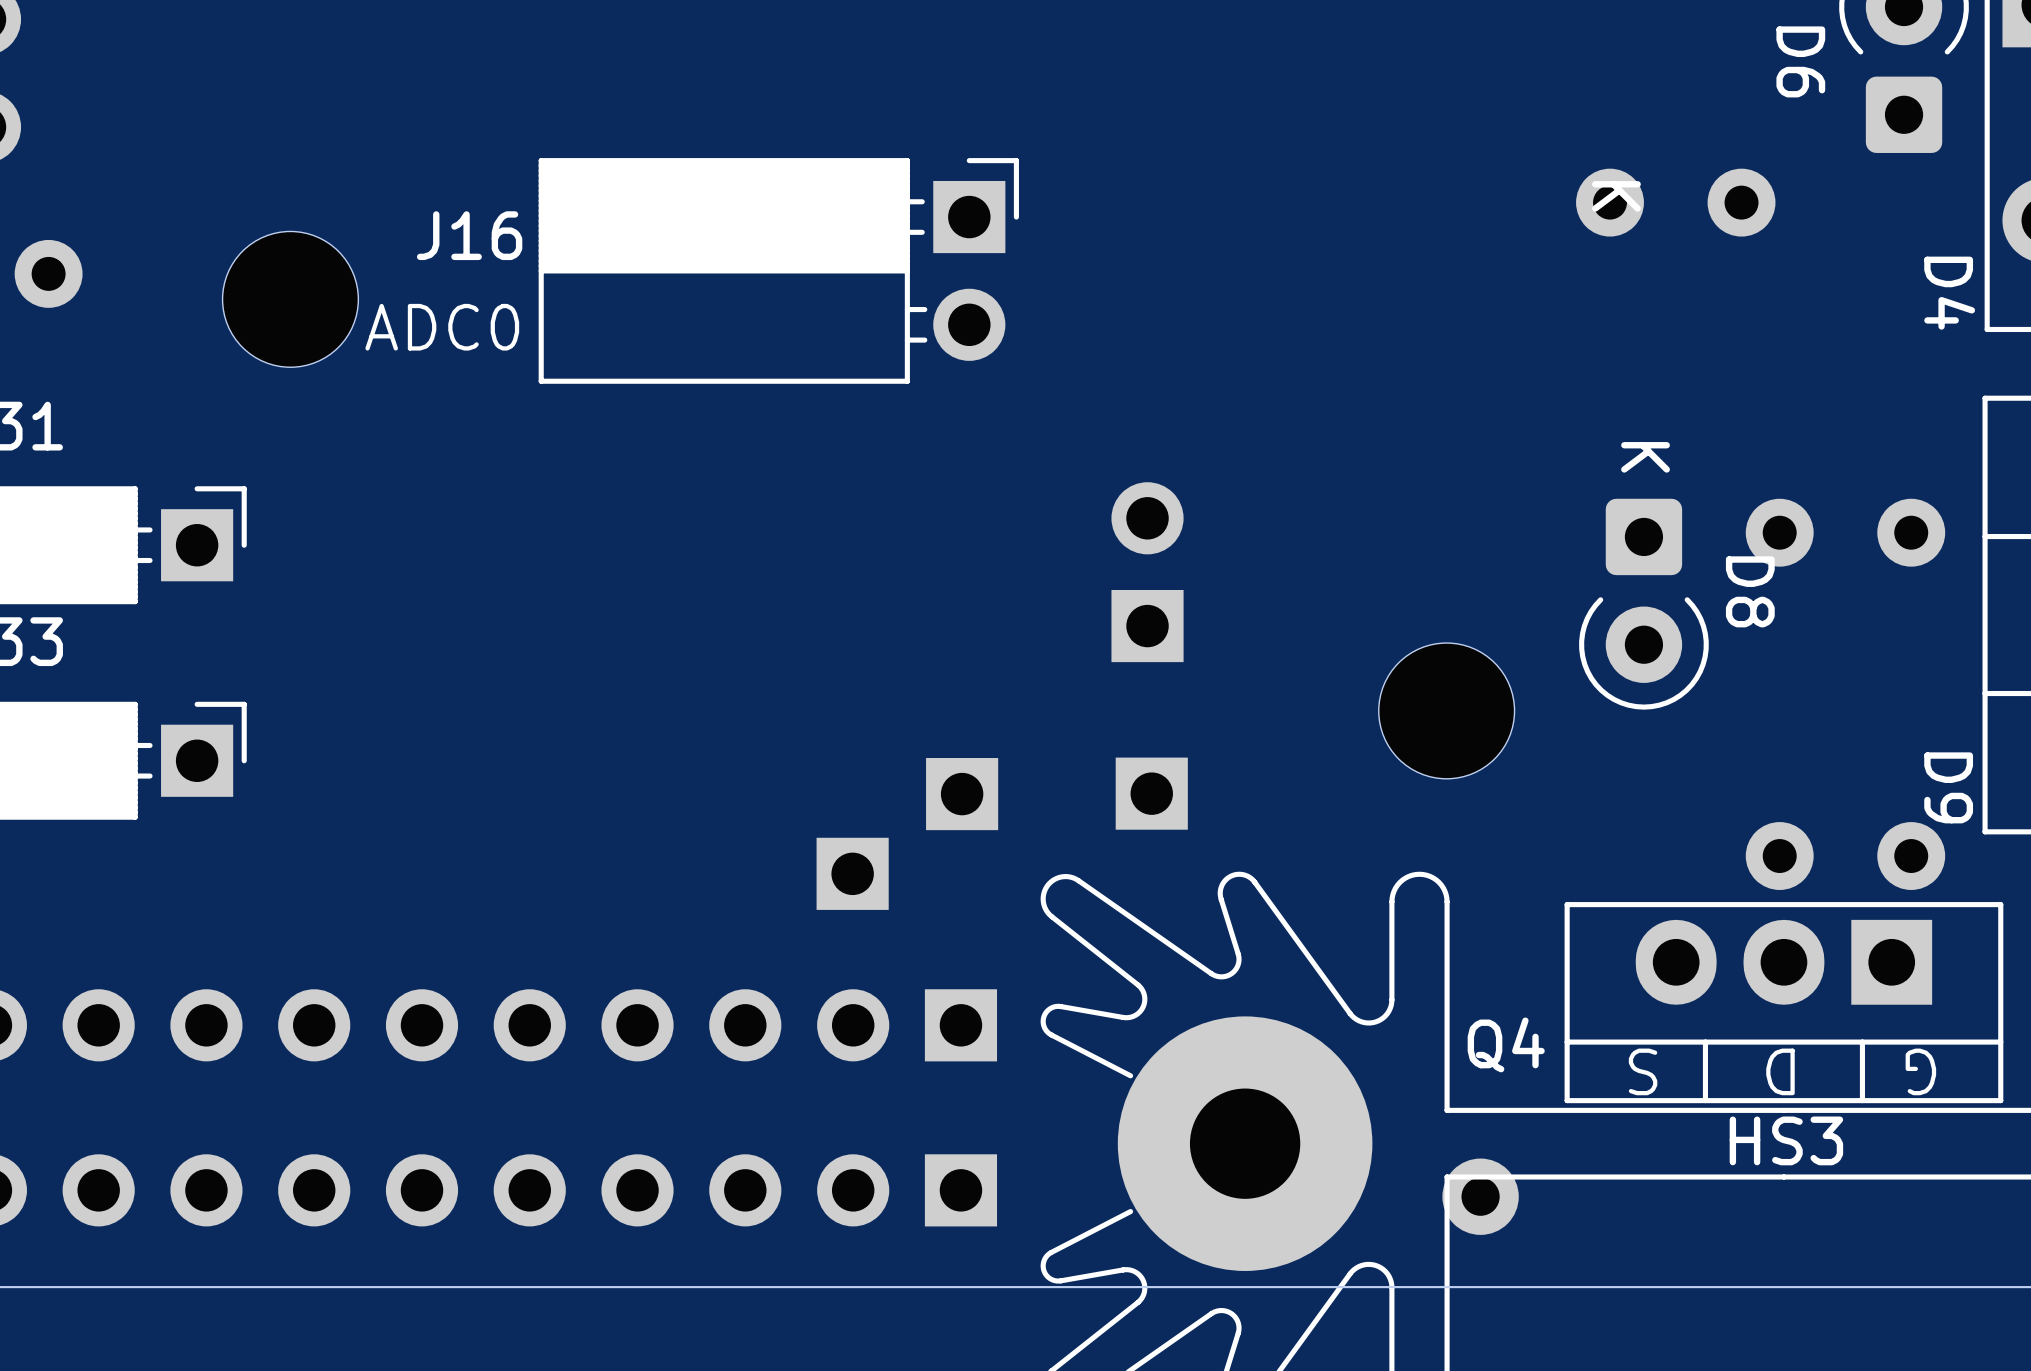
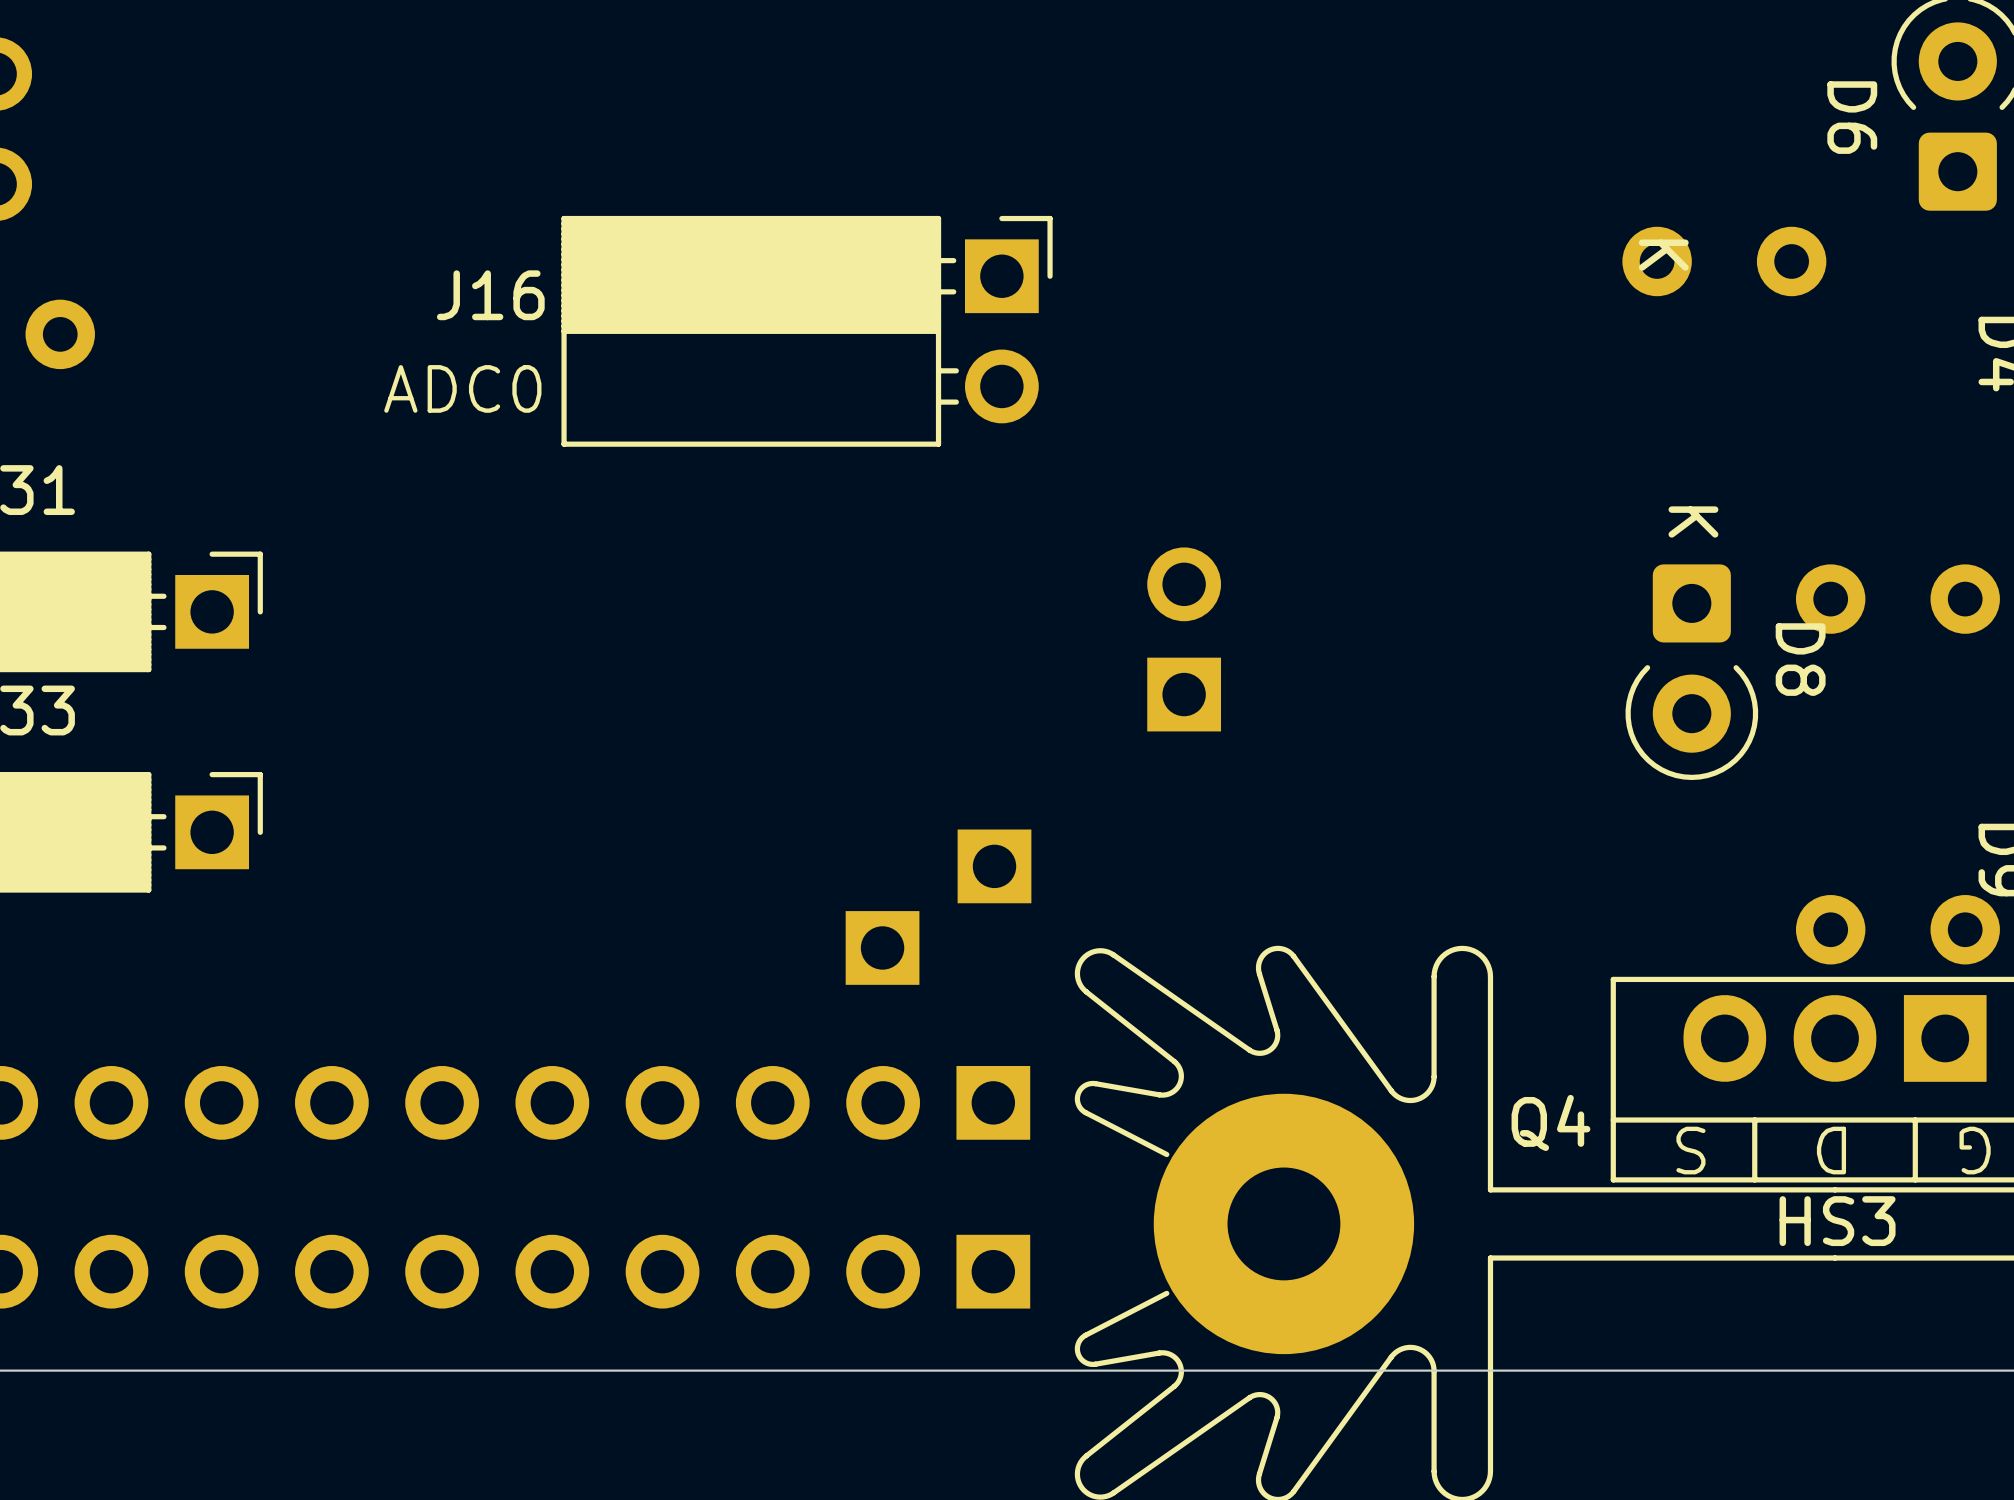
part: (290, 299) -> none
part: (1446, 710) -> none
part: (1151, 793) -> none
part: (1480, 1196) -> none

